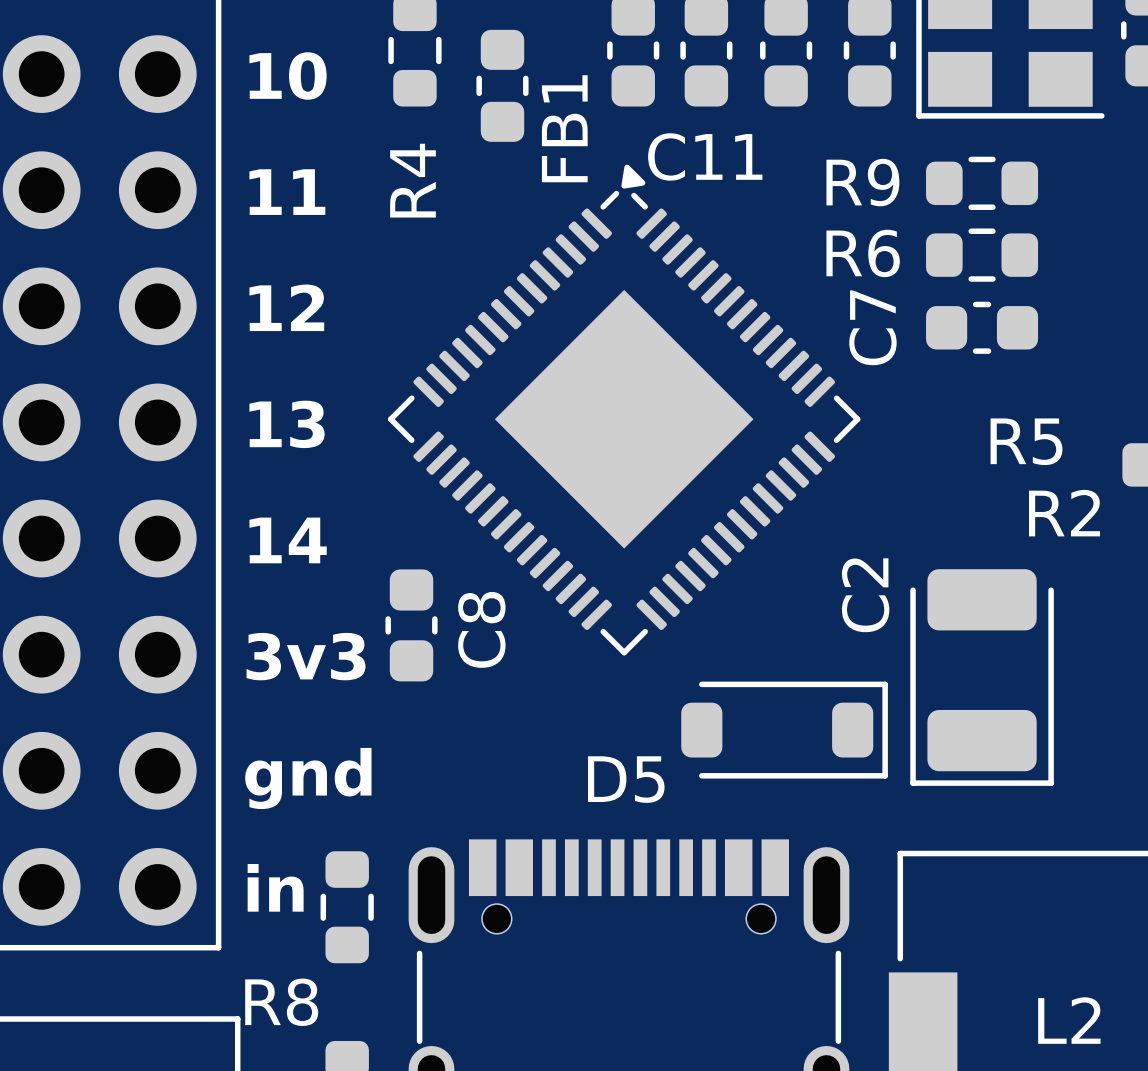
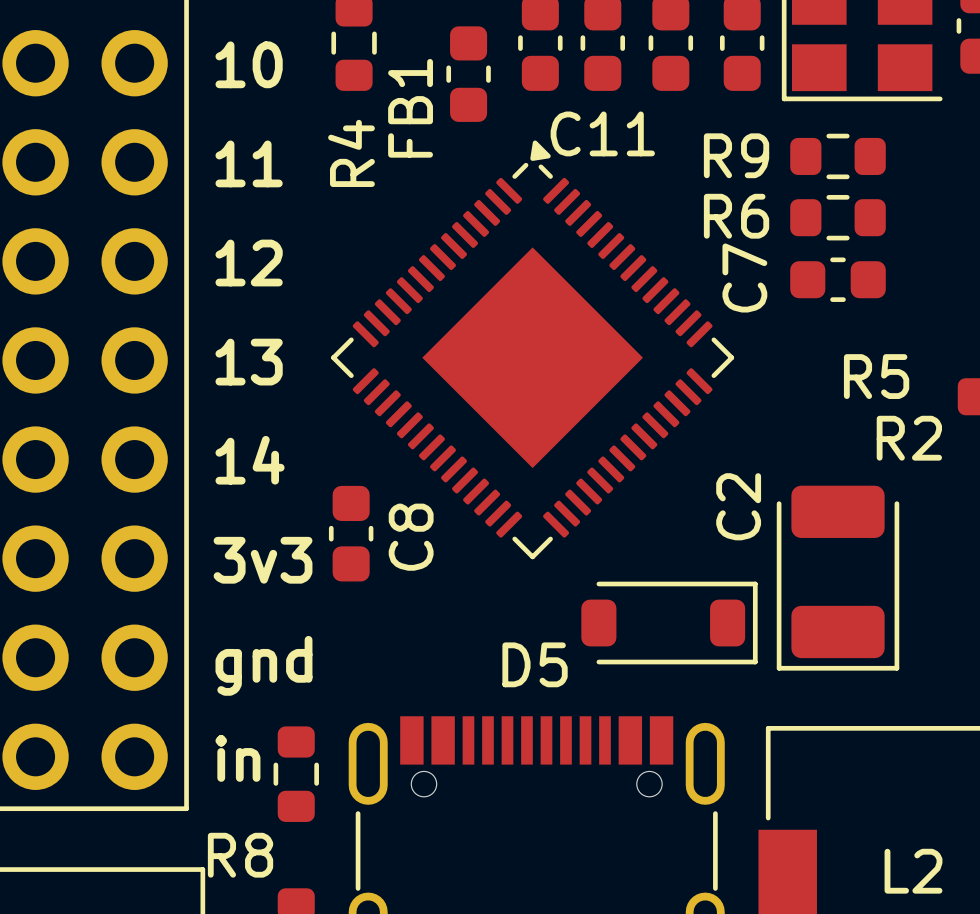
FB1 position: (502, 85) -> (468, 74)
FB1 name position: FB1 (564, 128) -> FB1 (410, 108)

